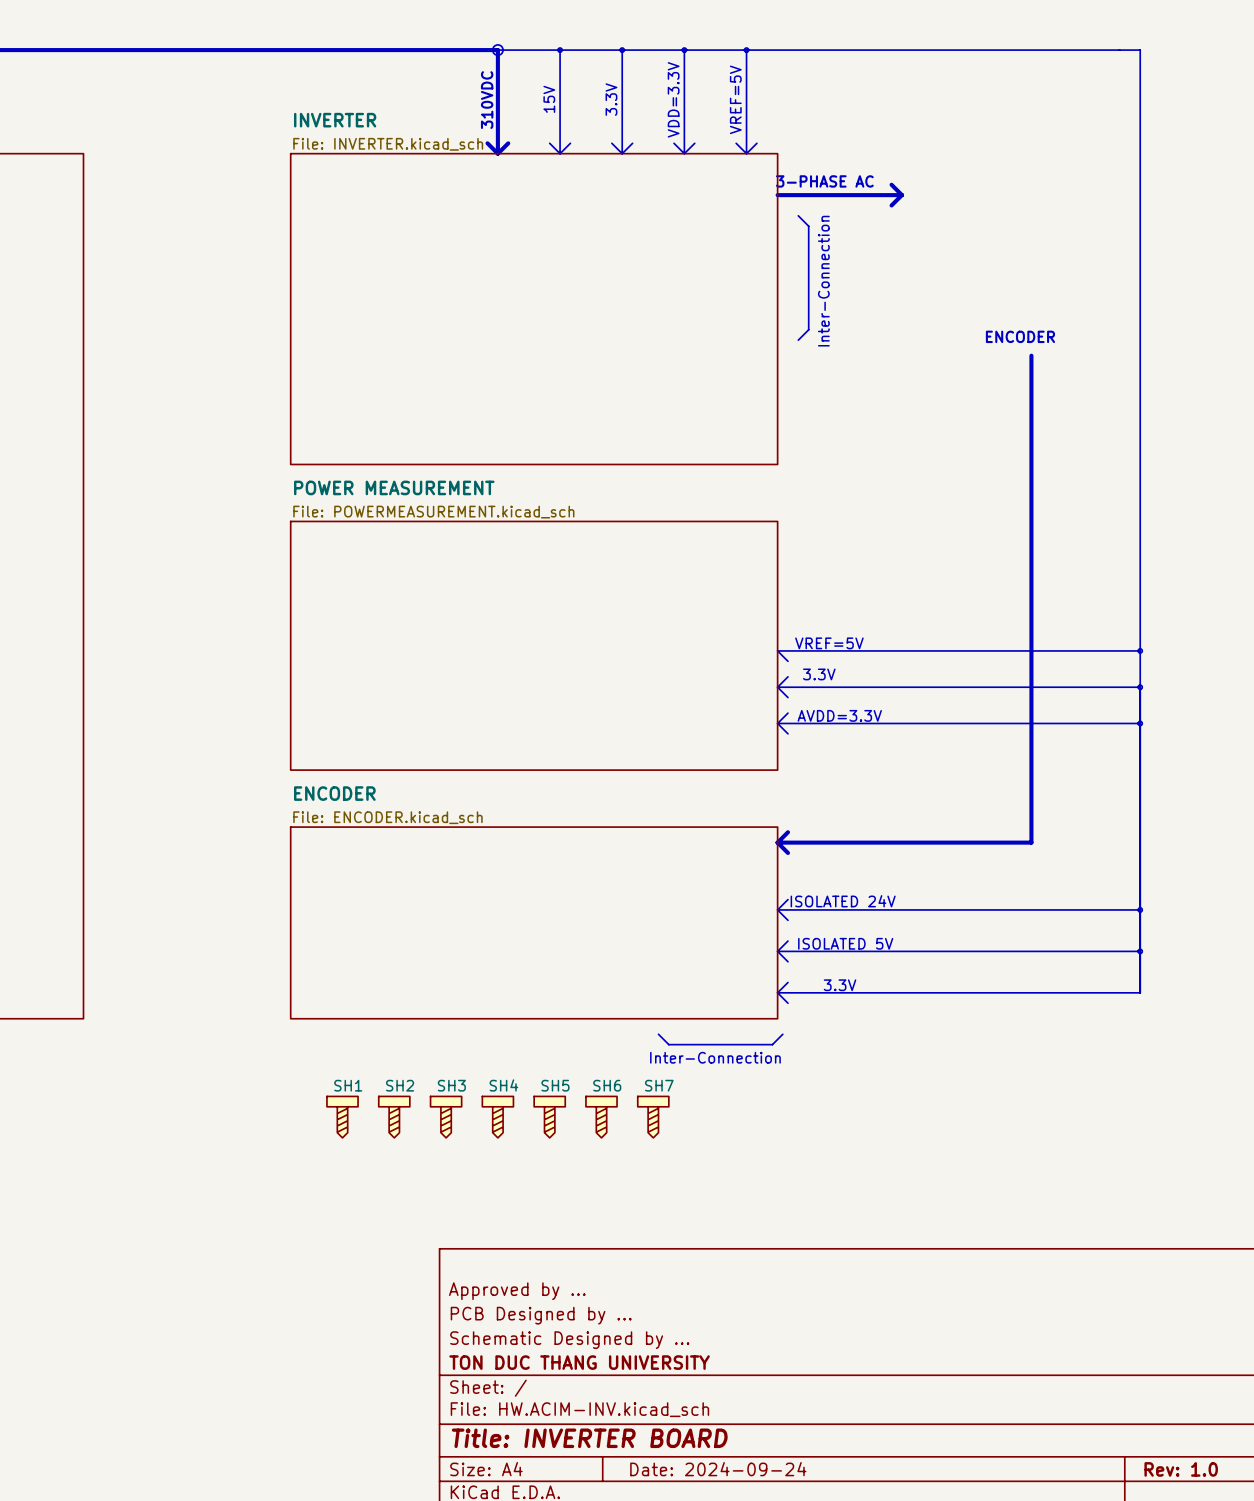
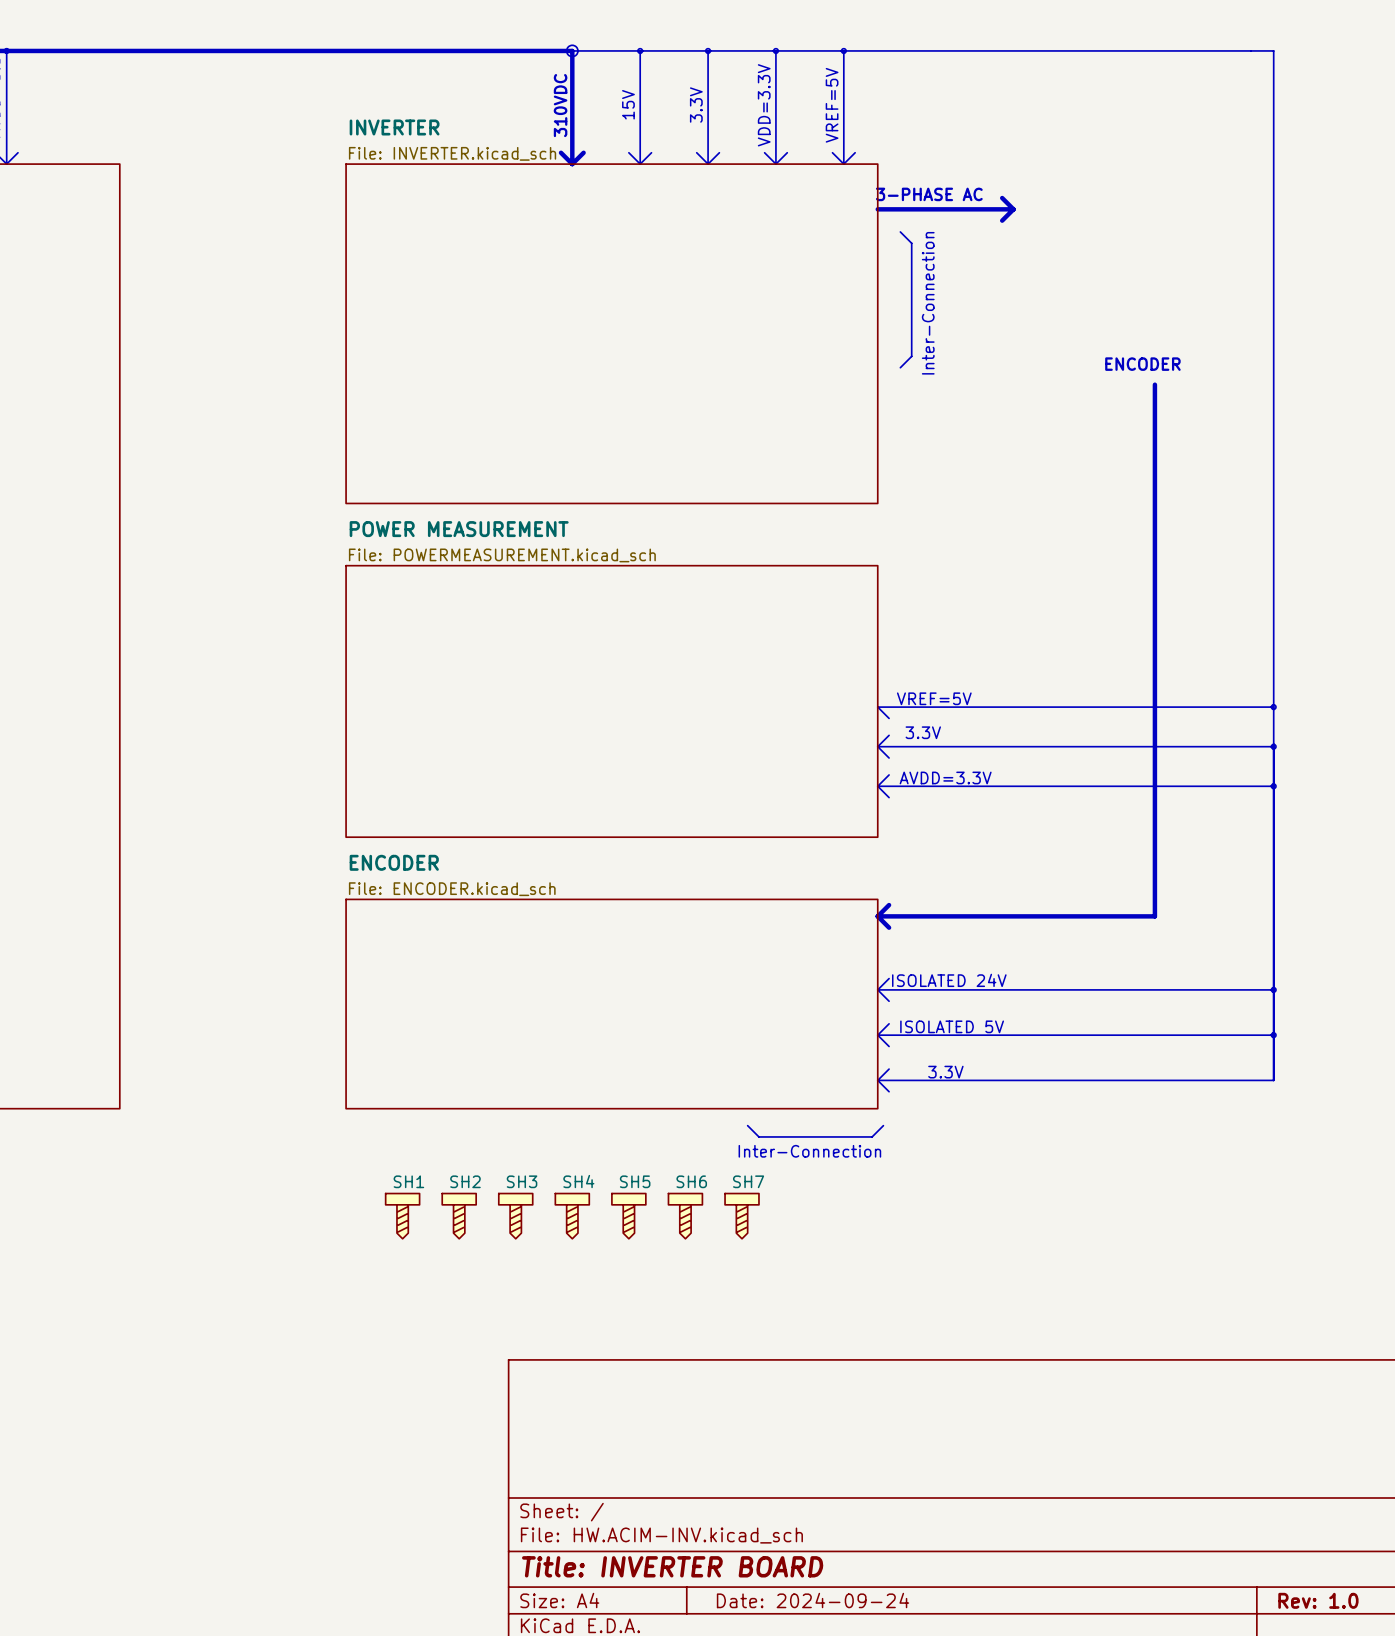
title block: Approved by ... (517, 1291) -> none
title block: PCB Designed by ... (541, 1315) -> none
title block: Schematic Designed by ... (569, 1340) -> none
title block: TON DUC THANG UNIVERSITY (579, 1362) -> none

